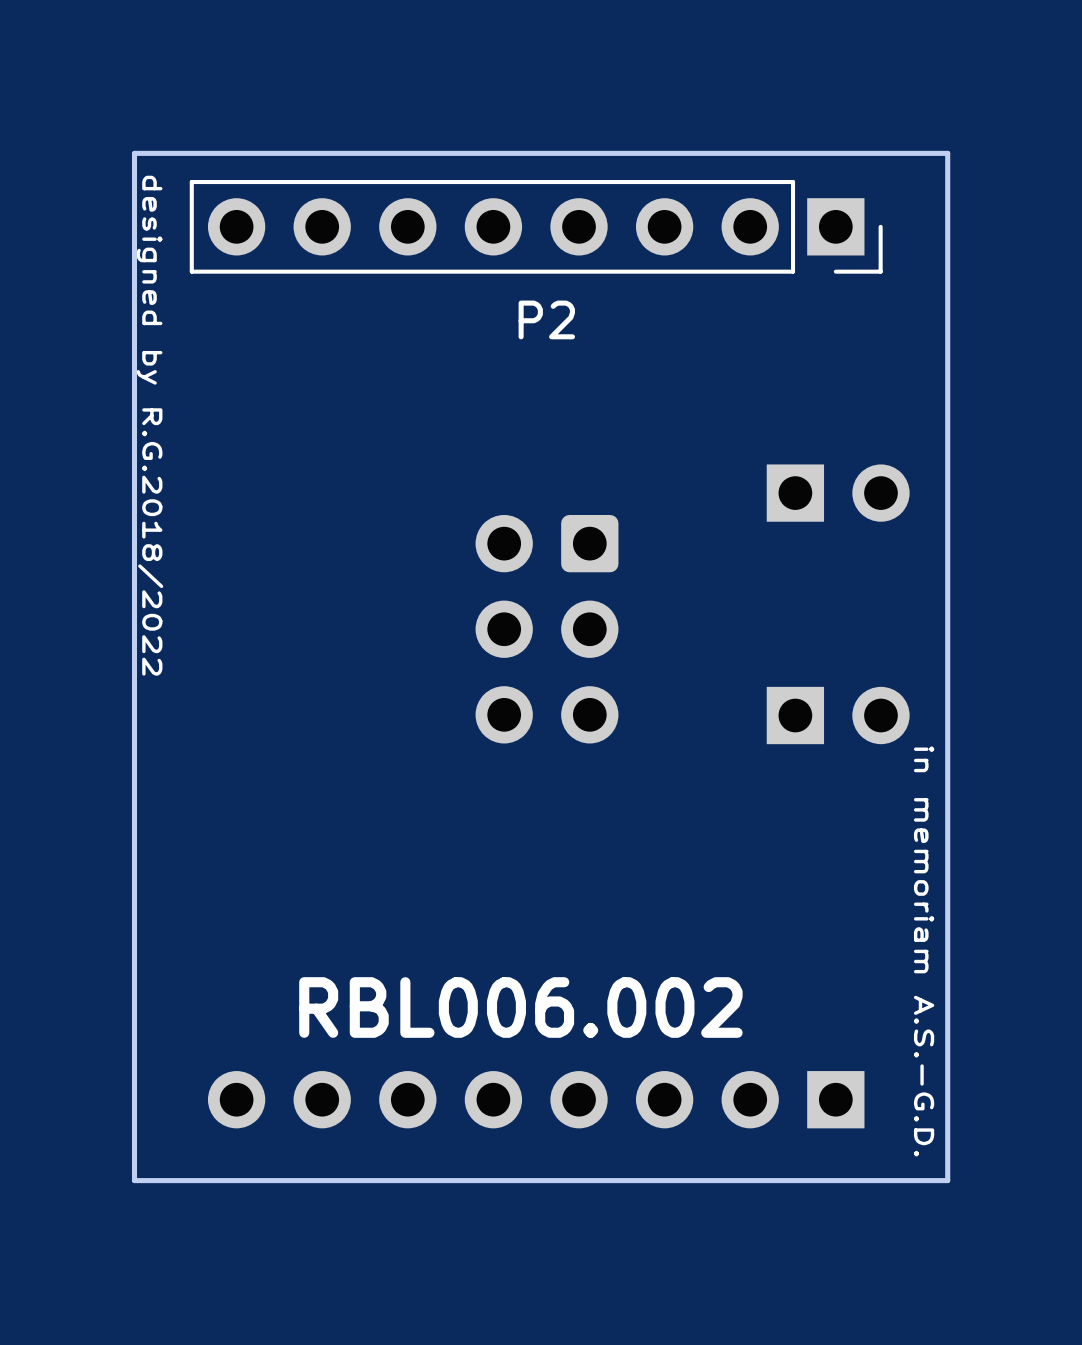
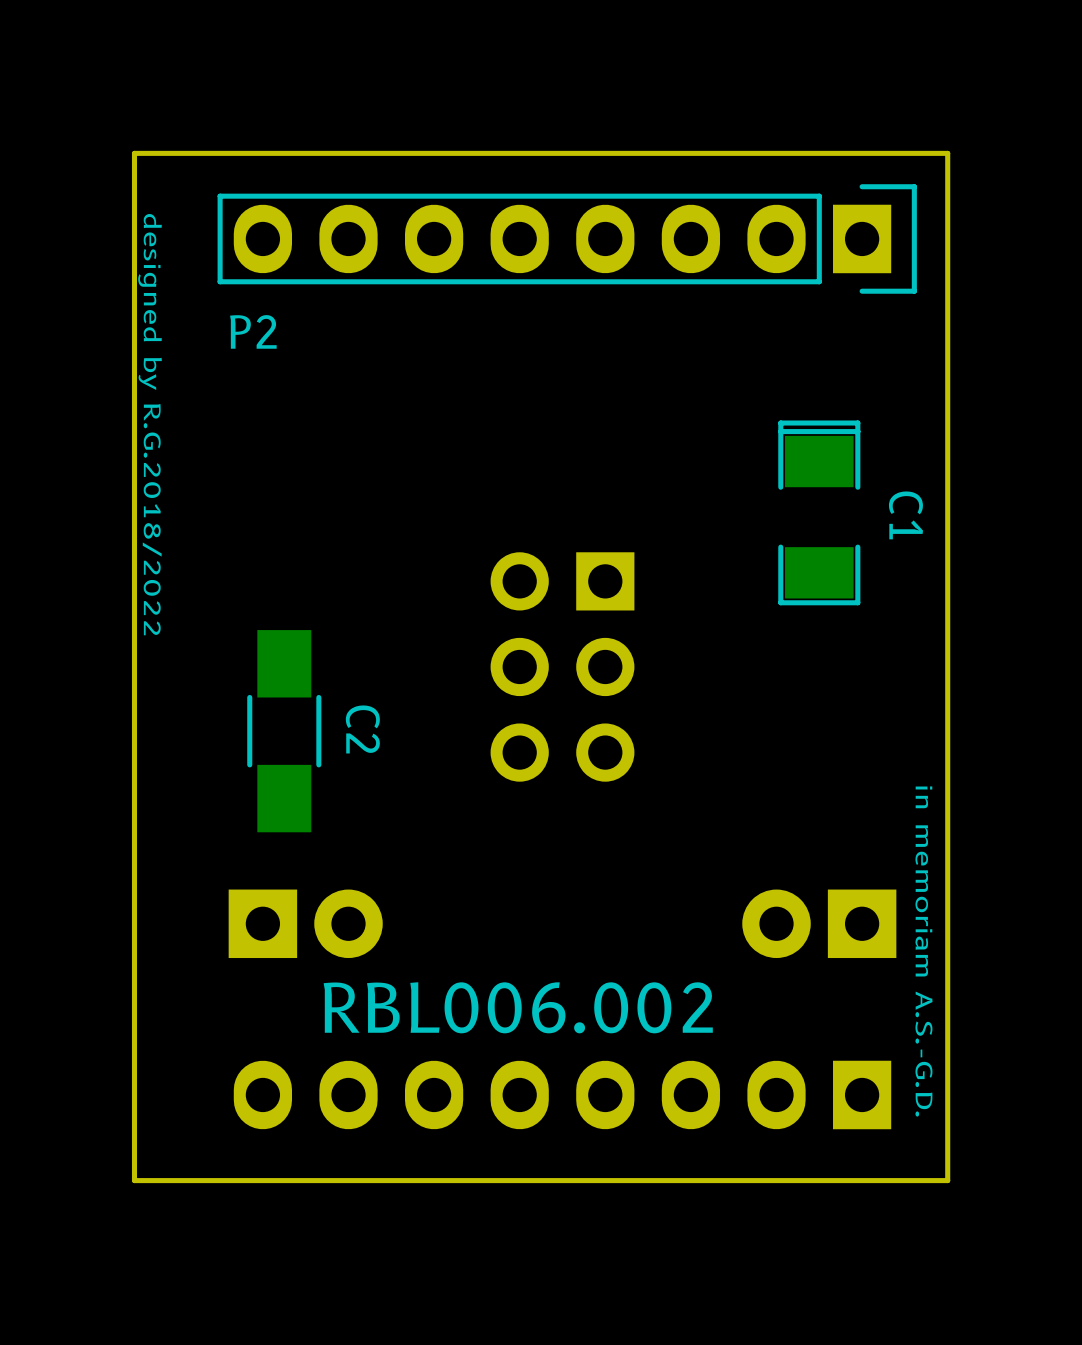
P2 footprint: [189, 179, 883, 274] -> [217, 184, 917, 294]
P2 name position: P2 (546, 319) -> P2 (253, 331)
part: (838, 493) -> none
C1: none -> (819, 512)
part: (547, 629) -> none
part: none -> (562, 666)
part: (838, 715) -> none
C2: none -> (284, 731)
part: none -> (305, 923)
part: none -> (819, 923)
part footprint: [207, 1071, 865, 1129] -> [233, 1060, 892, 1130]

